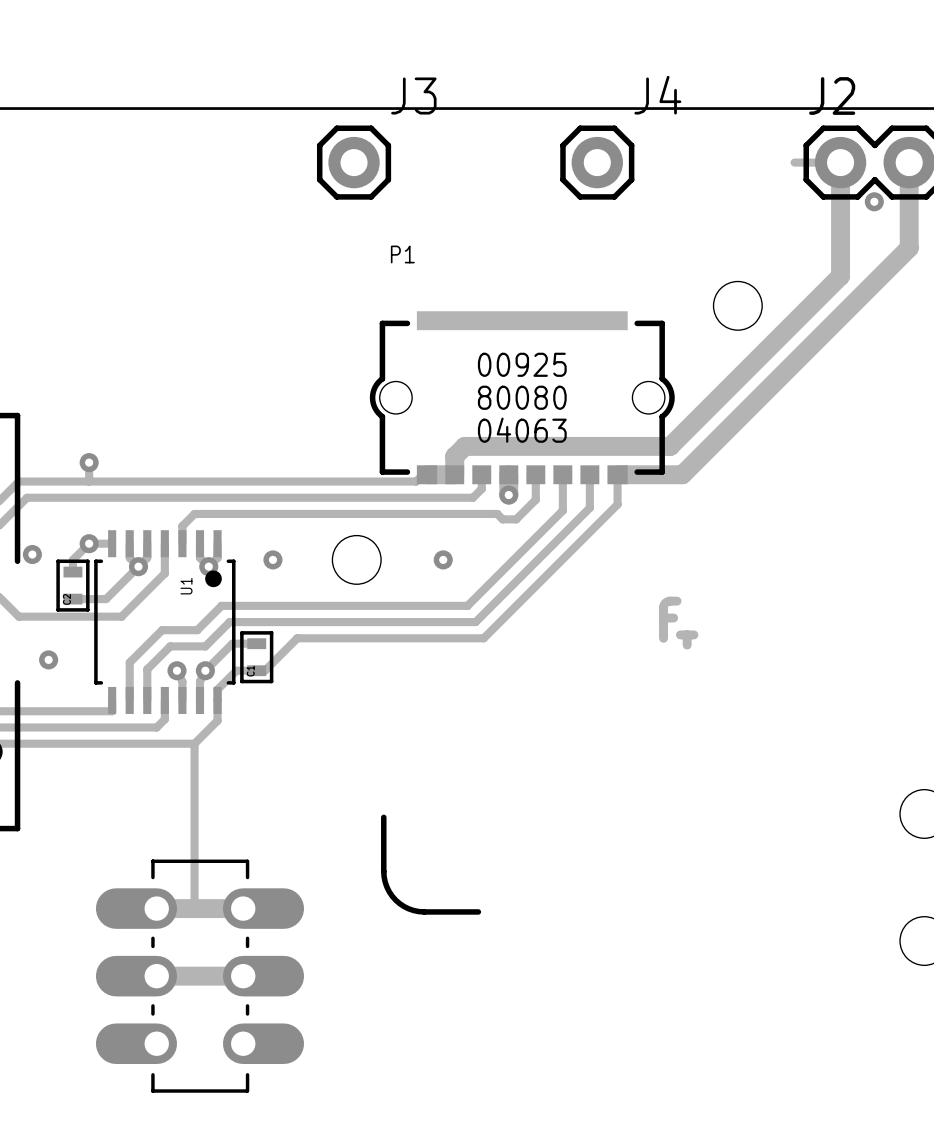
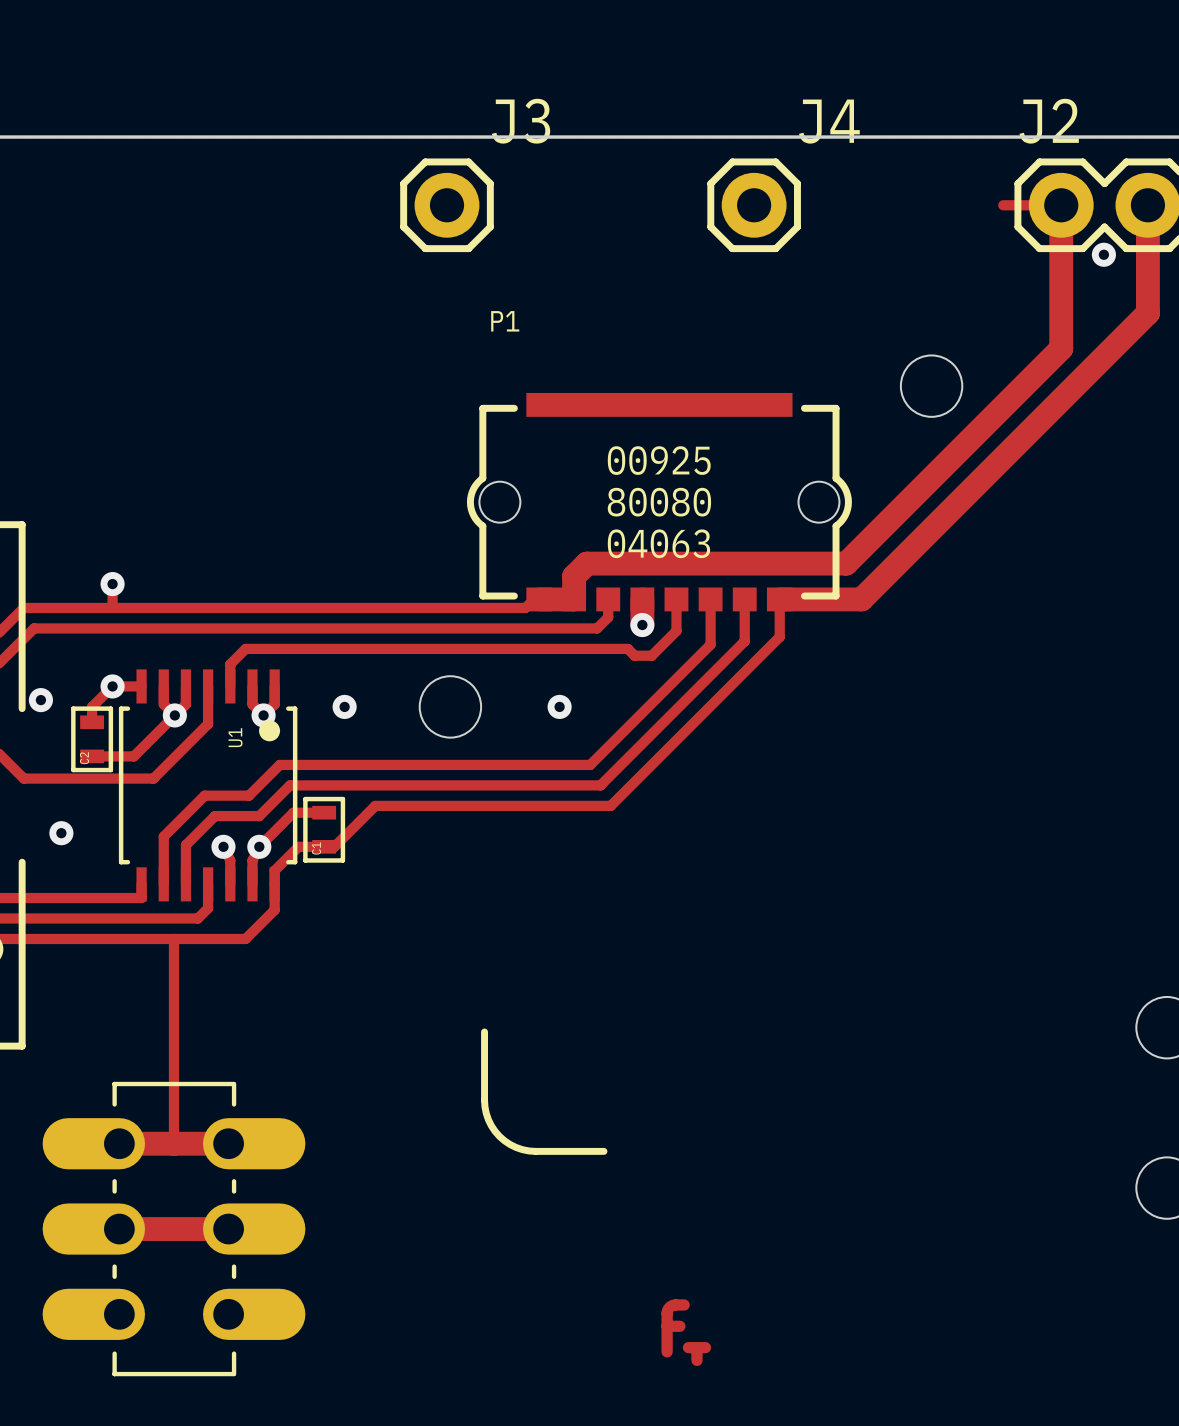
drawing position: (678, 623) -> (686, 1332)
track: none -> (174, 938) (174, 1143)
track: (194, 743) (194, 908) -> none
track: (156, 908) (243, 908) -> (119, 1143) (228, 1143)
track: (156, 976) (243, 976) -> (119, 1229) (228, 1229)
part position: (199, 976) -> (174, 1229)

